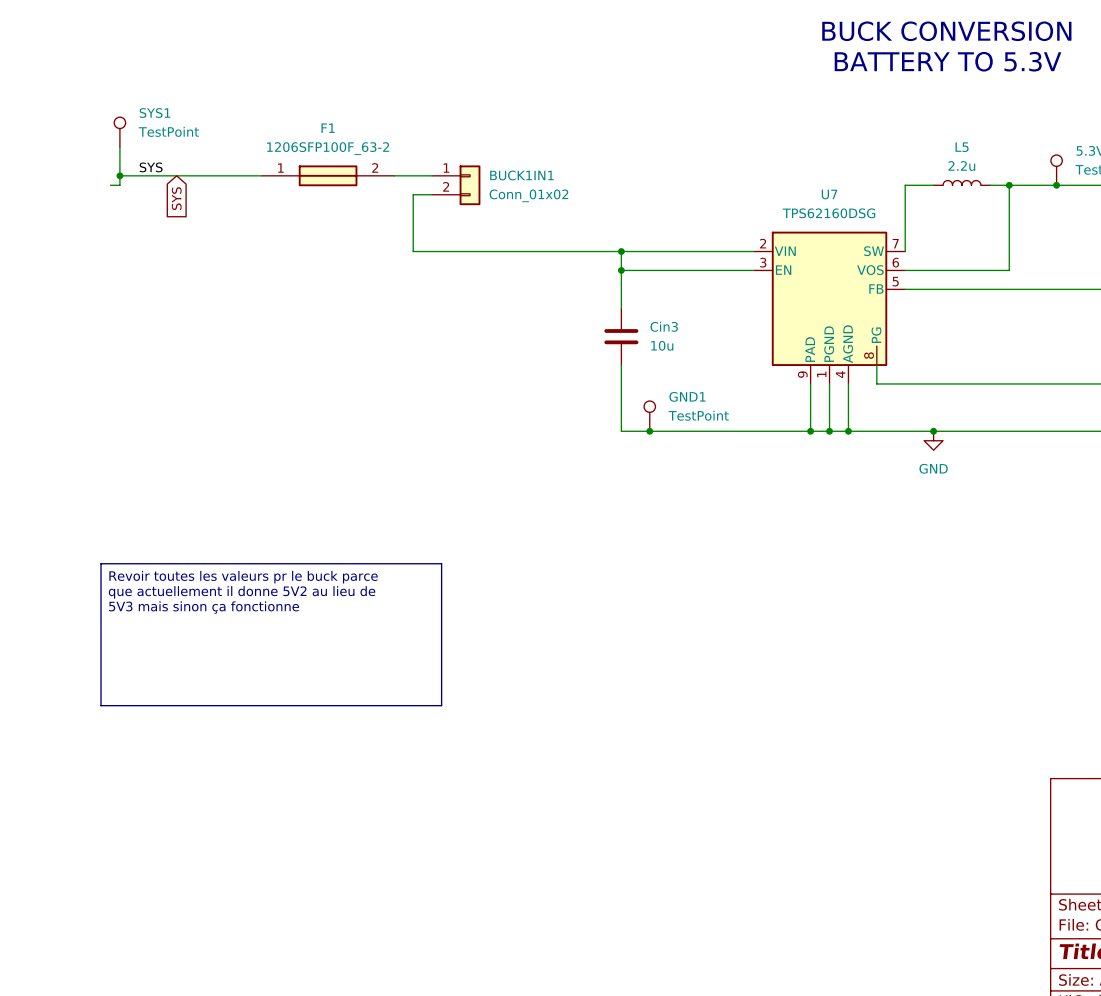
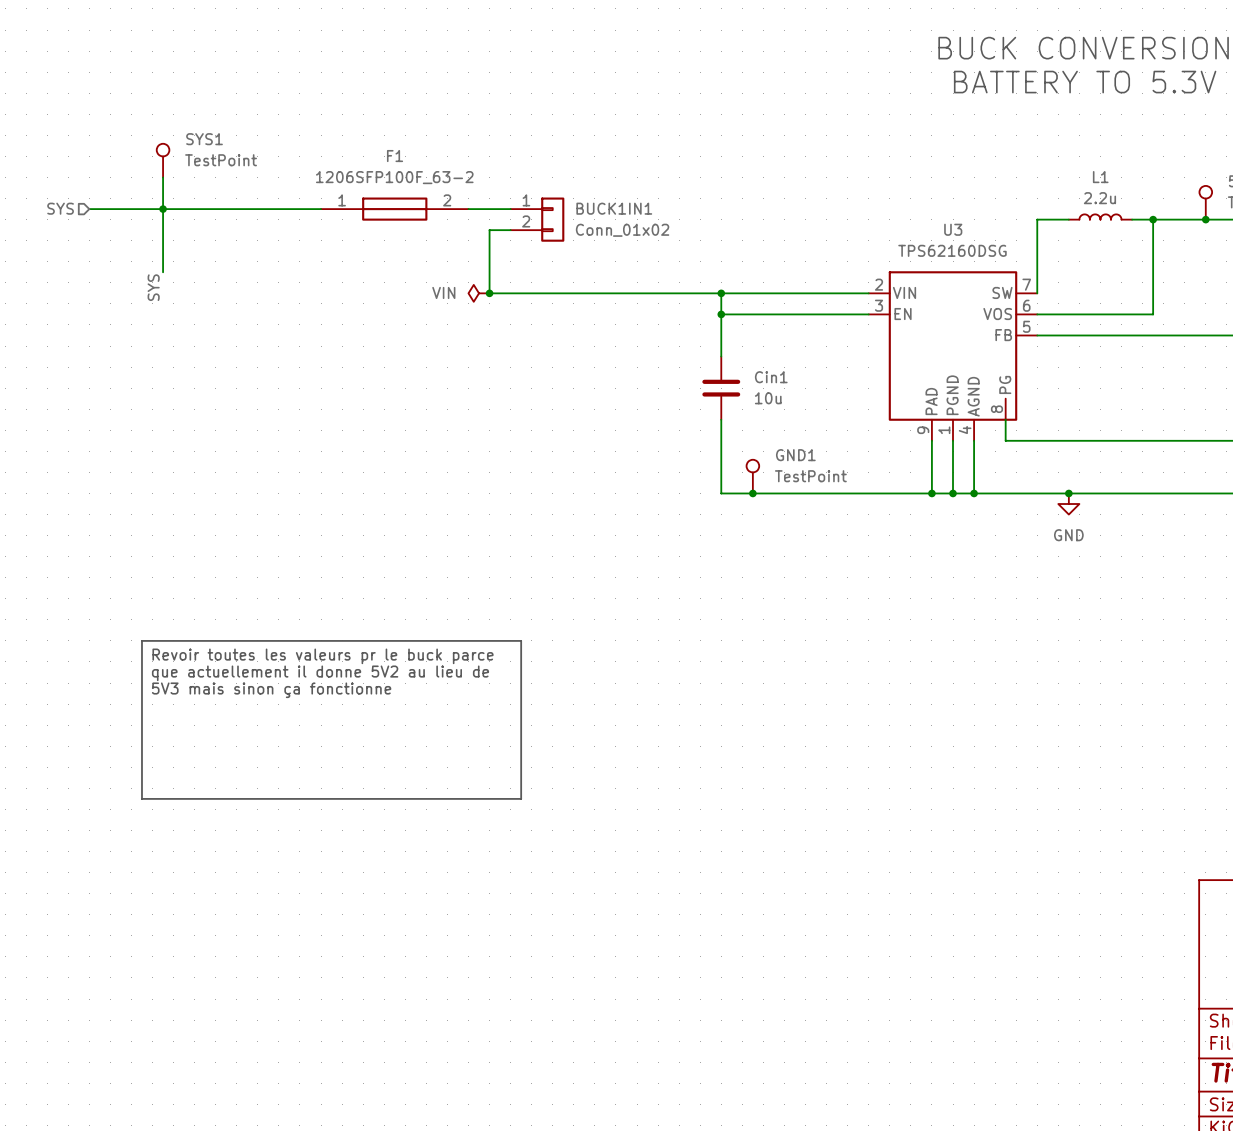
L5 name: L5 (962, 147) -> L1 (1100, 177)
label rotation: 0° (151, 167) -> 90° counterclockwise (153, 287)
label position: SYS (151, 167) -> SYS (153, 287)
hierarchical label: none -> SYS (60, 208)
wire: none -> (89, 209) (163, 209)
wire: (110, 185) (119, 185) -> (163, 272) (163, 219)
U7 name: U7 (829, 194) -> U3 (953, 229)
global label: SYS (176, 198) -> none
power symbol: none -> VIN (479, 293)
junction: none -> (489, 293)
Cin3 name: Cin3 (664, 326) -> Cin1 (771, 377)

